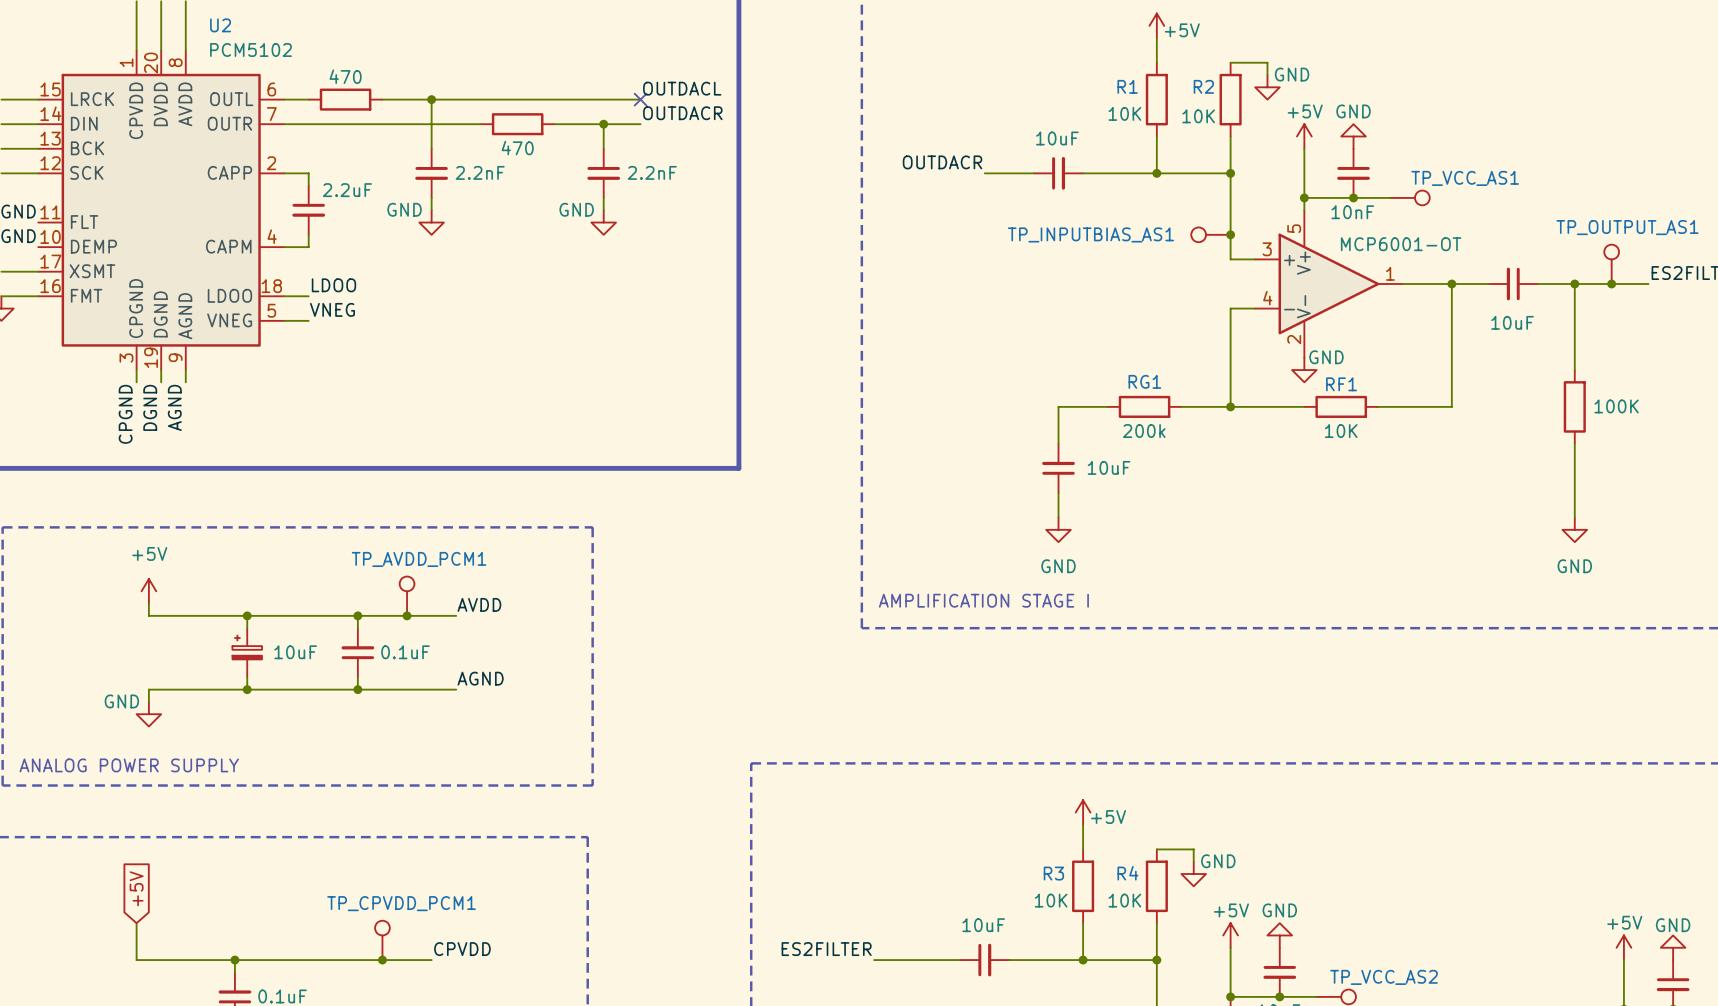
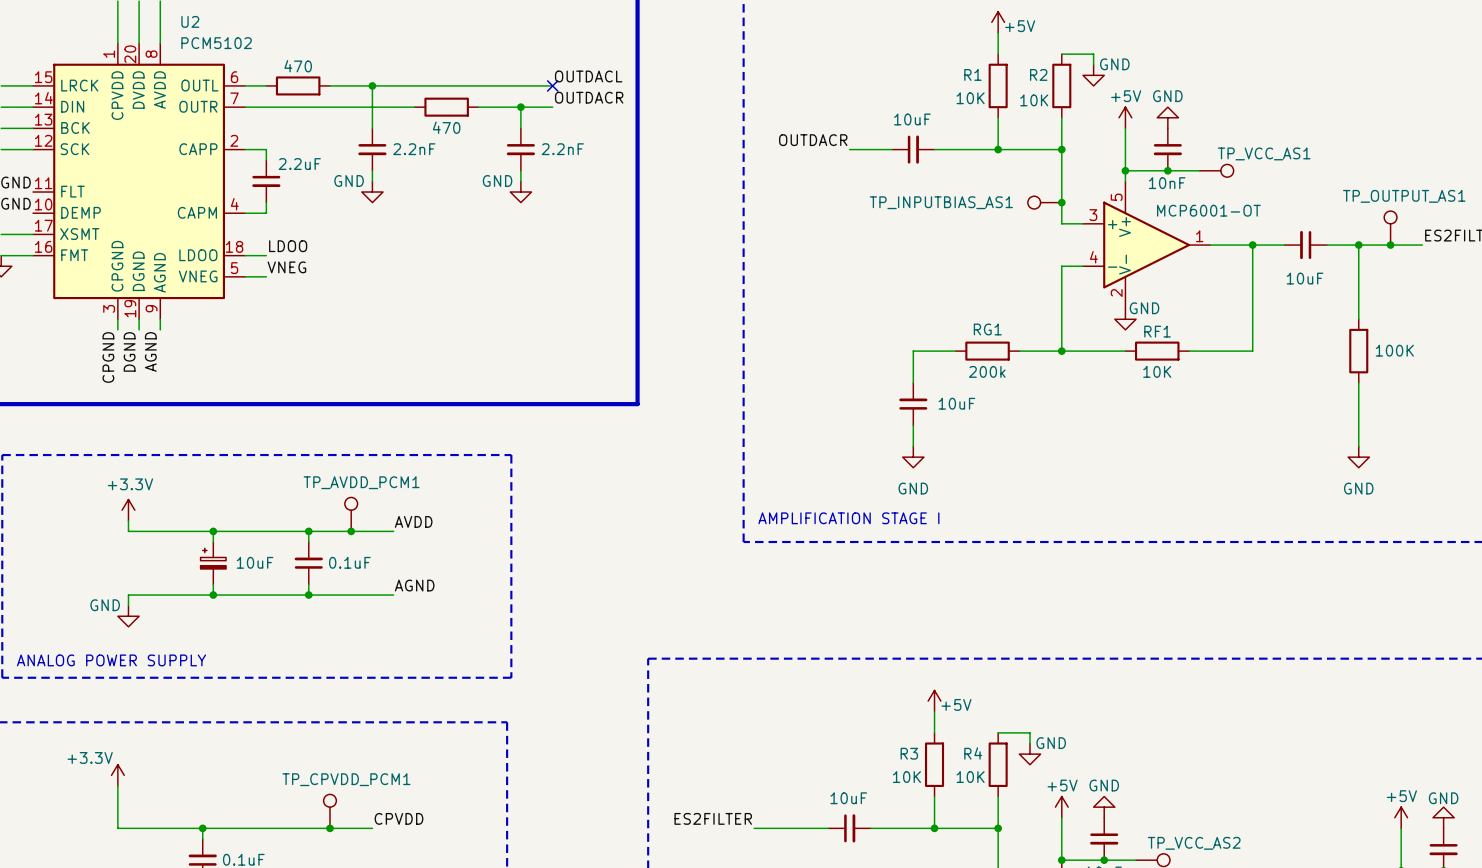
power symbol: +5V (148, 591) -> +3.3V (128, 510)
global label: +5V (136, 888) -> none
power symbol: none -> +3.3V (117, 775)
wire: none -> (117, 785) (117, 796)

